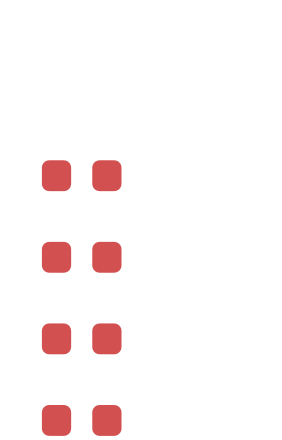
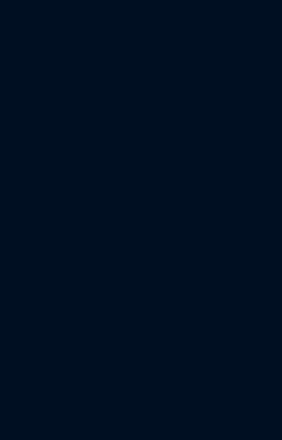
part: (81, 175) -> none
part: (81, 257) -> none
part: (81, 338) -> none
part: (81, 420) -> none

